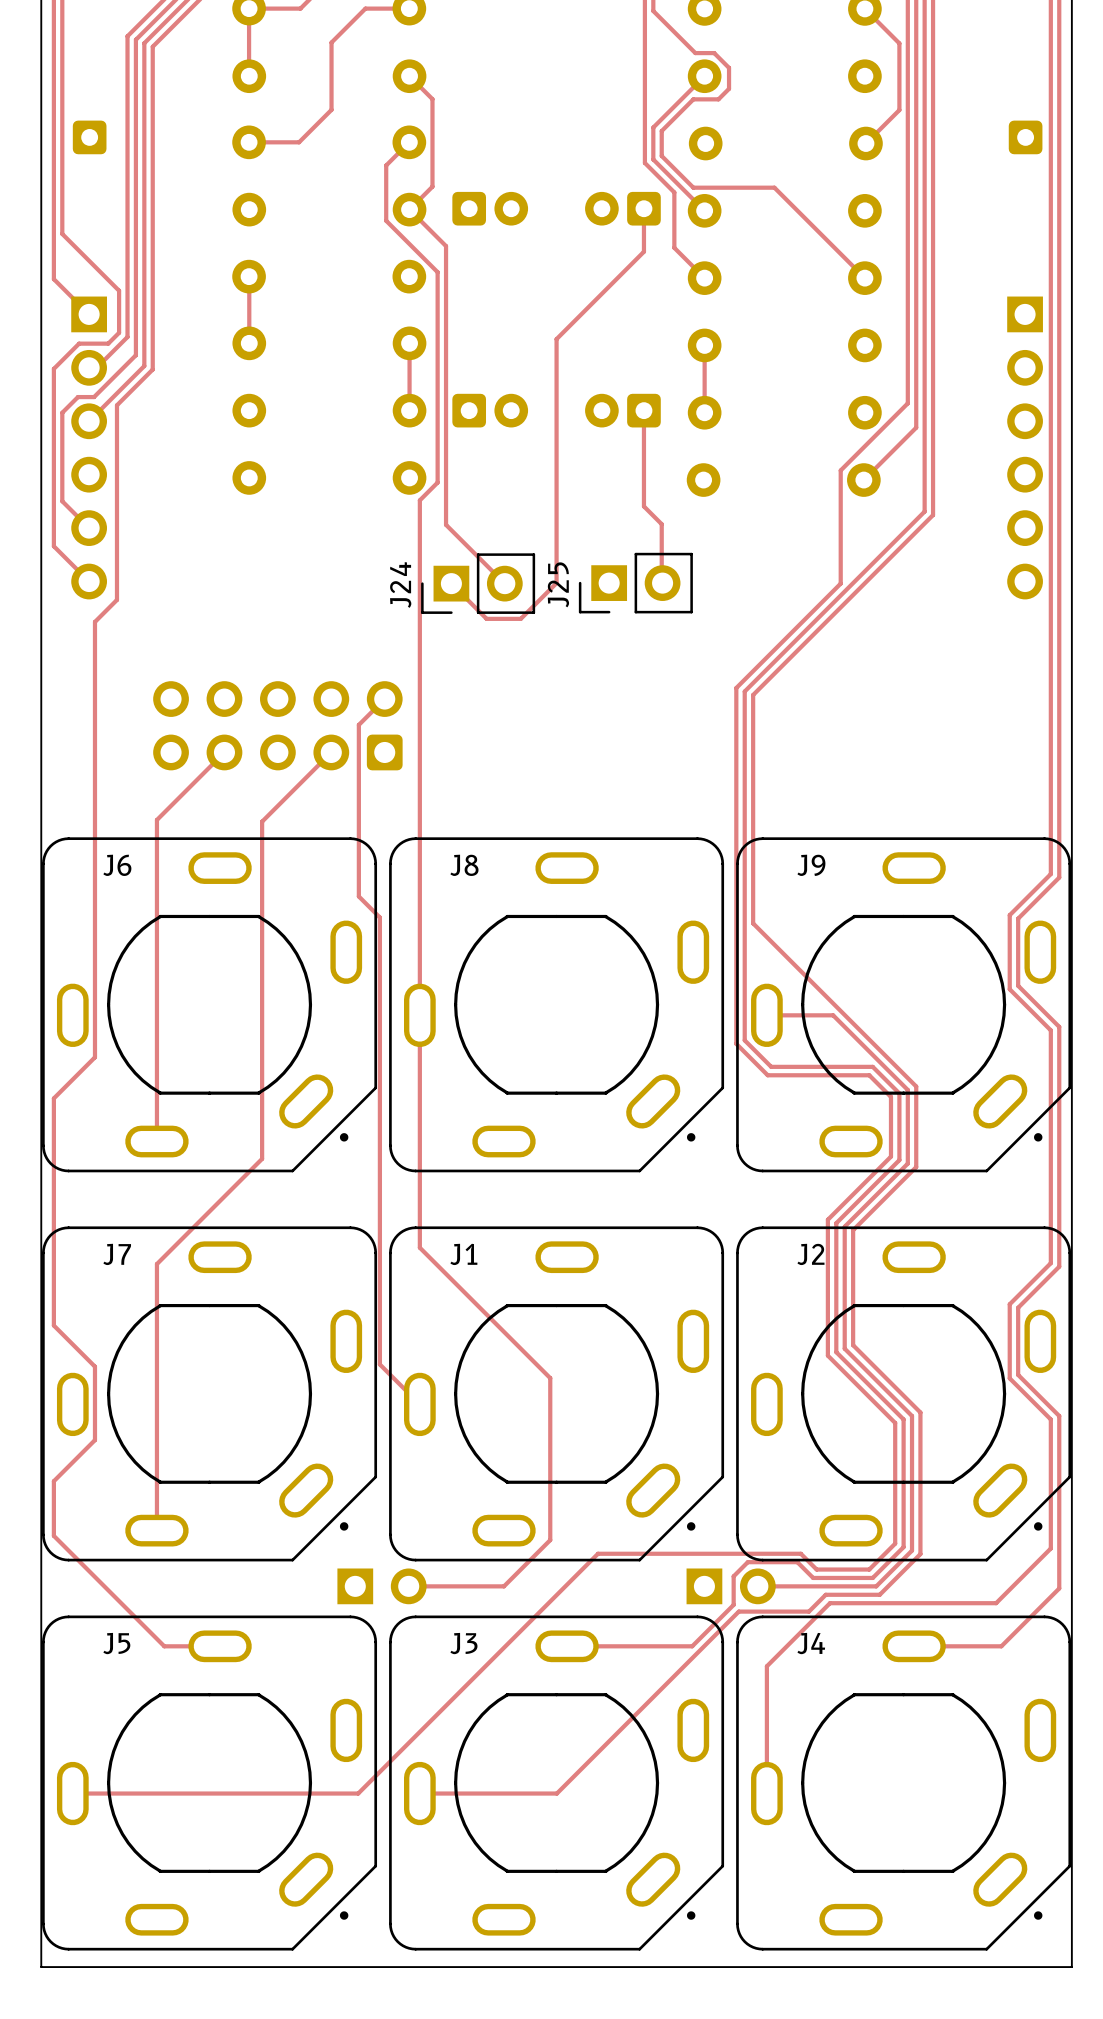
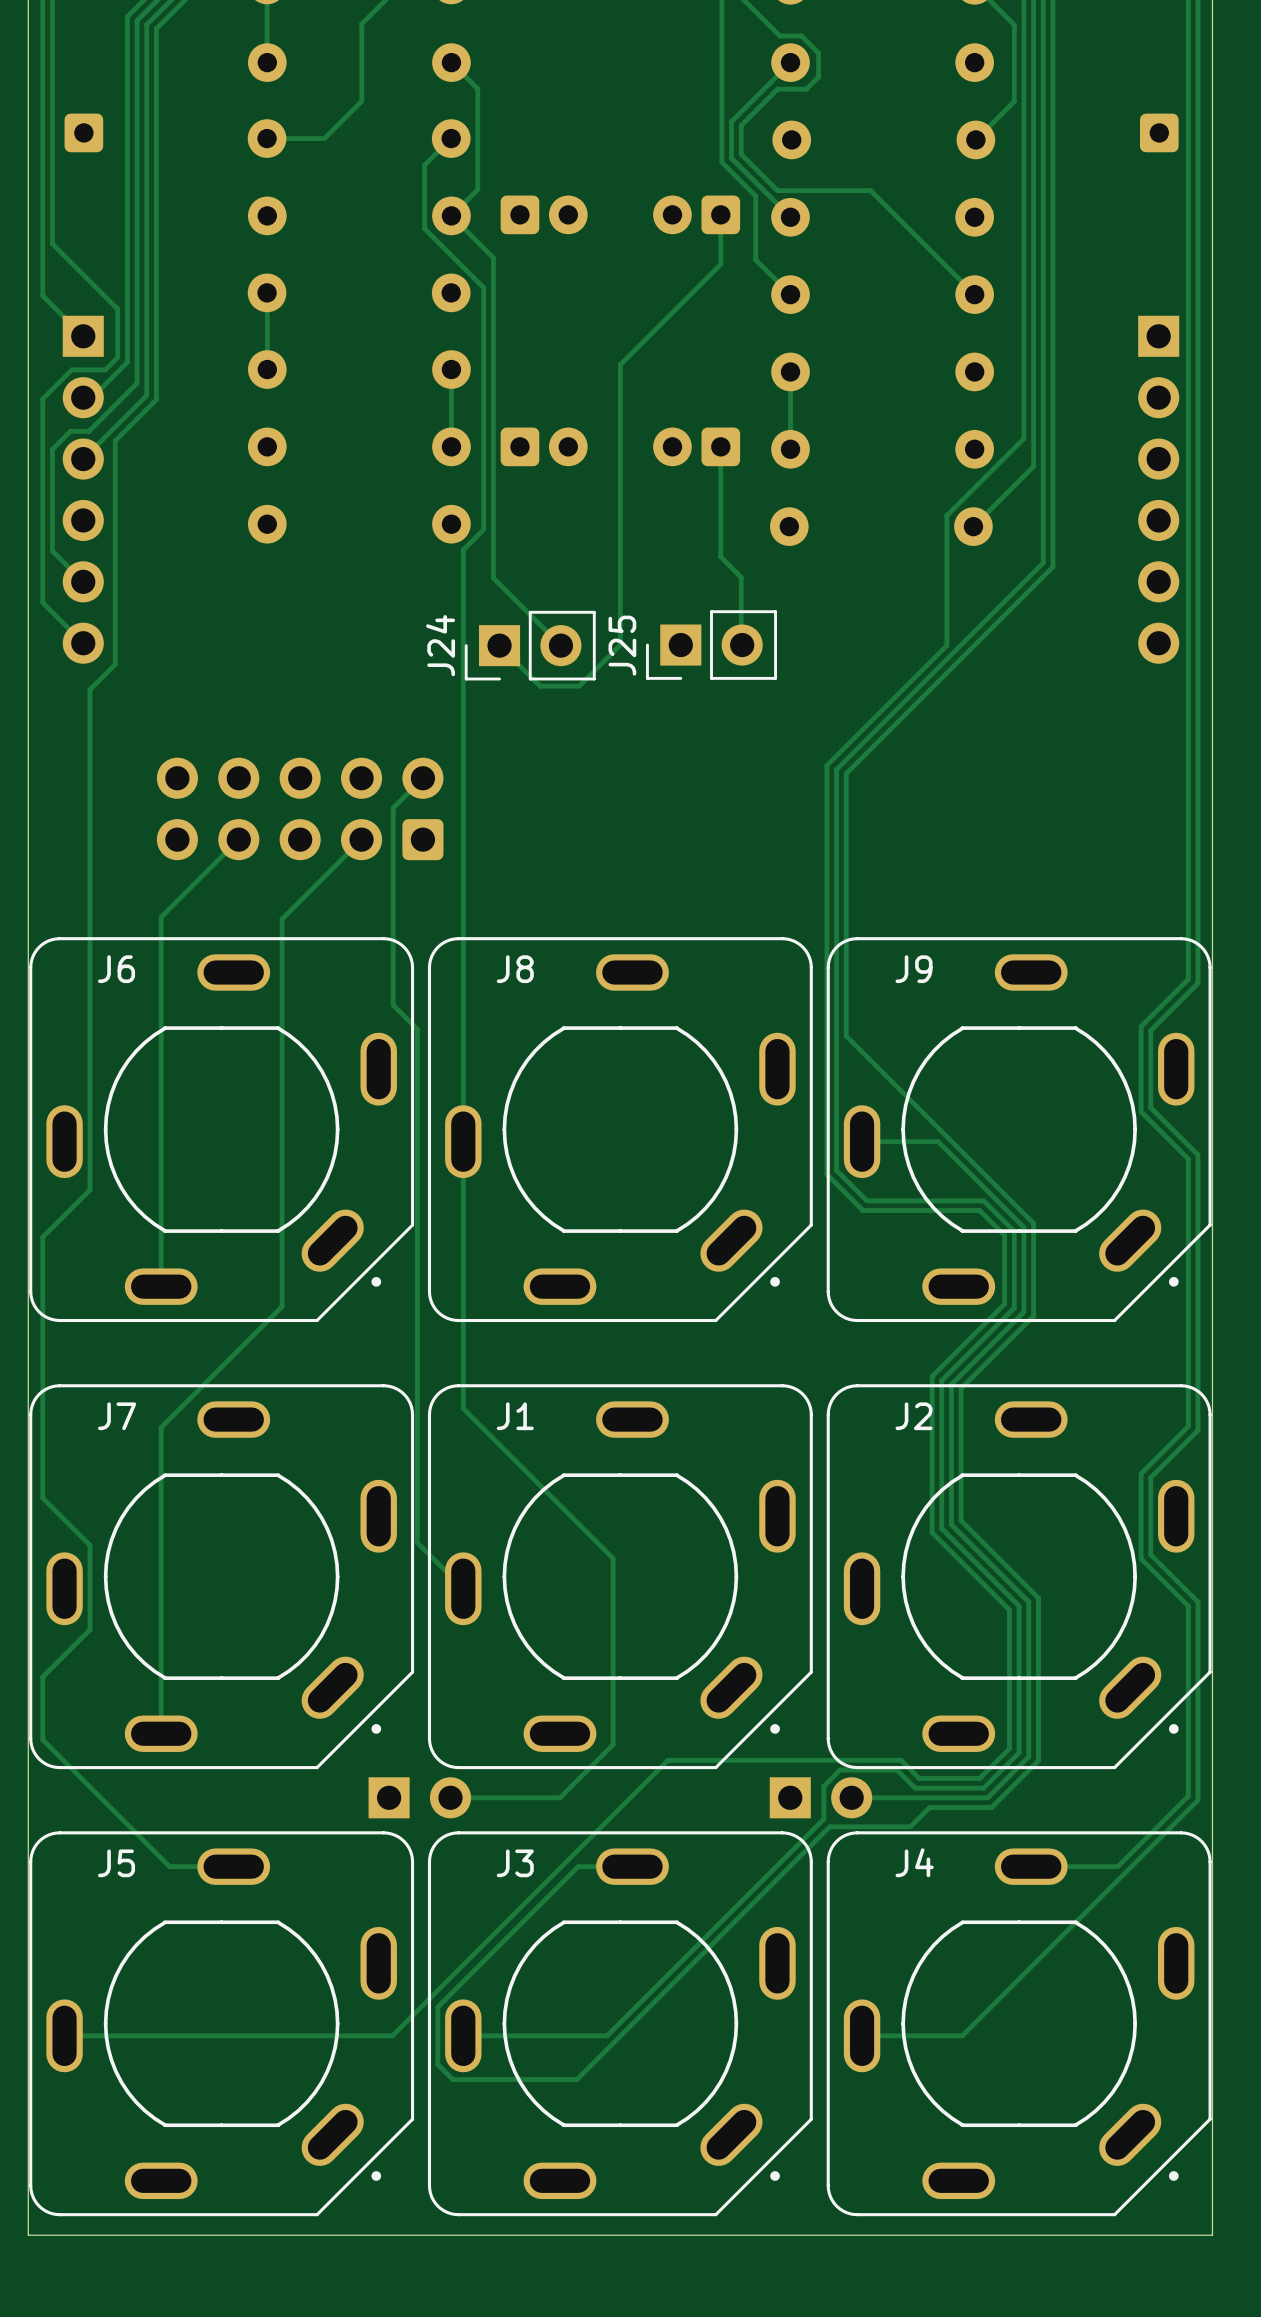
track: (1050, 1548) (996, 1603) (830, 1603) (766, 1666) (766, 1793) -> (1131, 1866) (962, 2035) (862, 2035)
track: (567, 1646) (692, 1646) -> (607, 2035) (776, 1866)
track: (989, 1646) (1001, 1646) -> (1117, 1866) (1188, 1796) (1188, 1754)
track: (545, 1793) (556, 1793) -> (632, 1866) (578, 1866) (437, 2007) (437, 2064) (452, 2079) (577, 2079) (620, 2035)

